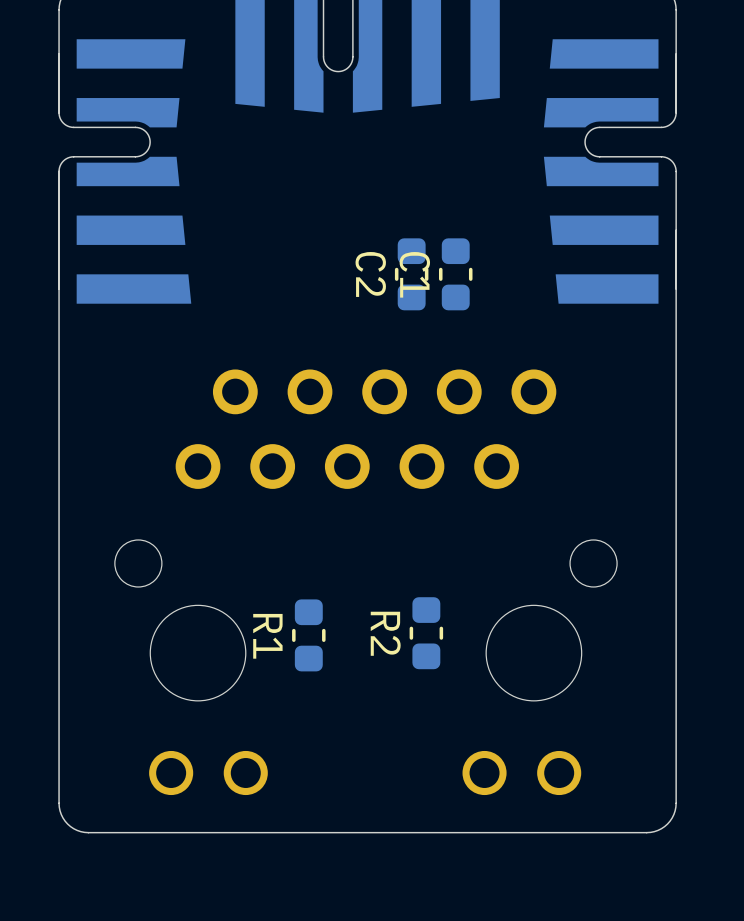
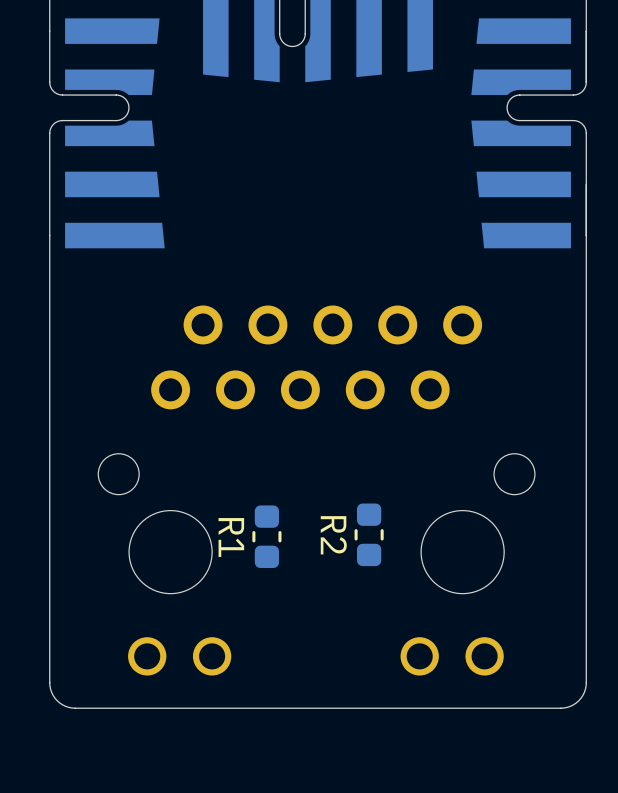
board edge: (59, 53) (59, 112) -> none
board edge: (59, 171) (59, 289) -> none
C2: (411, 274) -> none
C1: (455, 274) -> none

